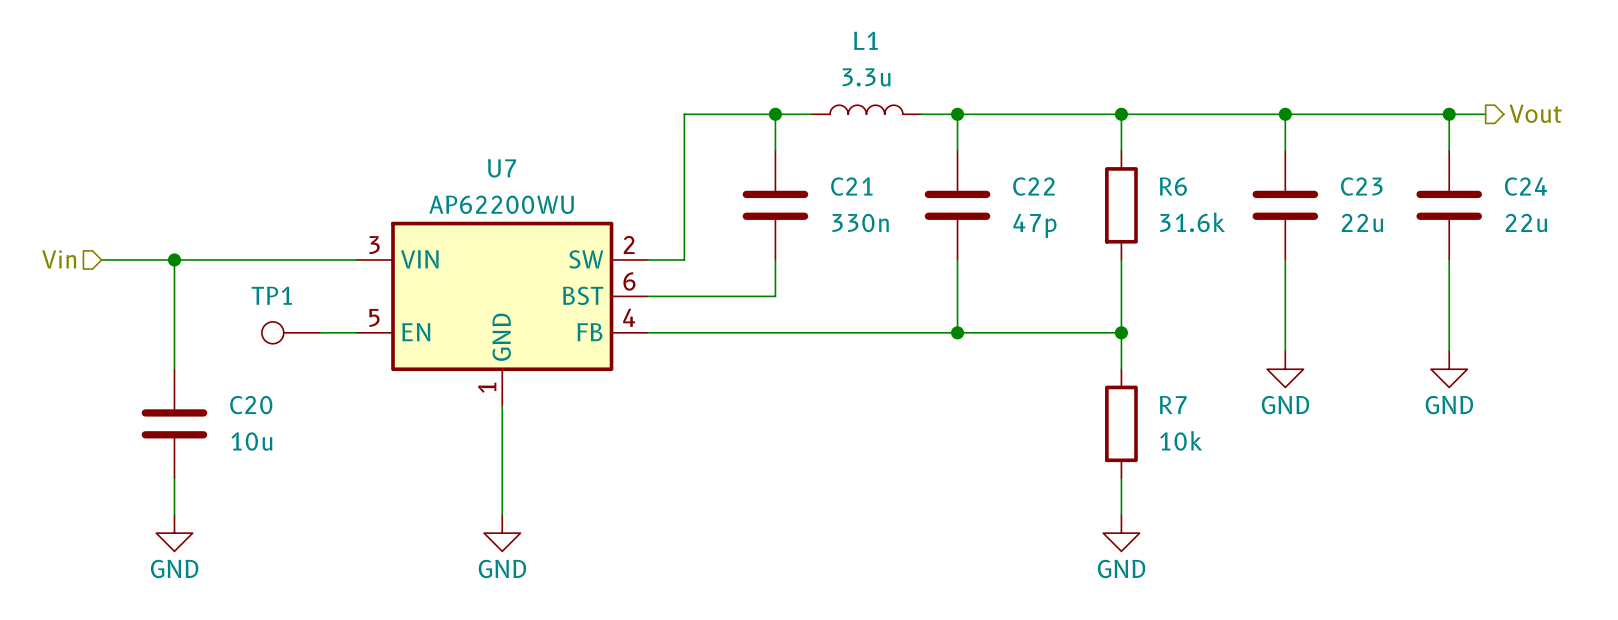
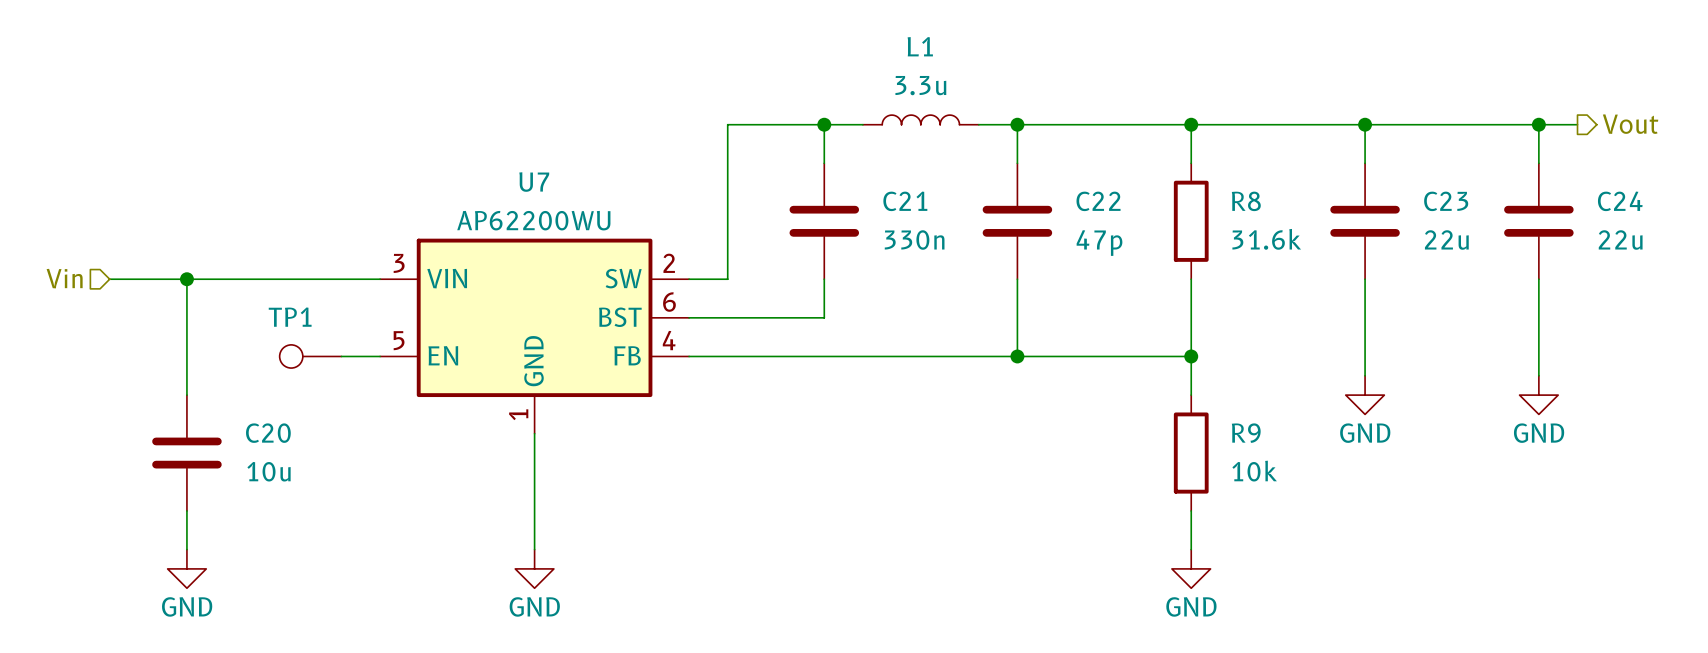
R6 name: R6 (1173, 186) -> R8 (1246, 201)
R7 name: R7 (1173, 405) -> R9 (1246, 433)

